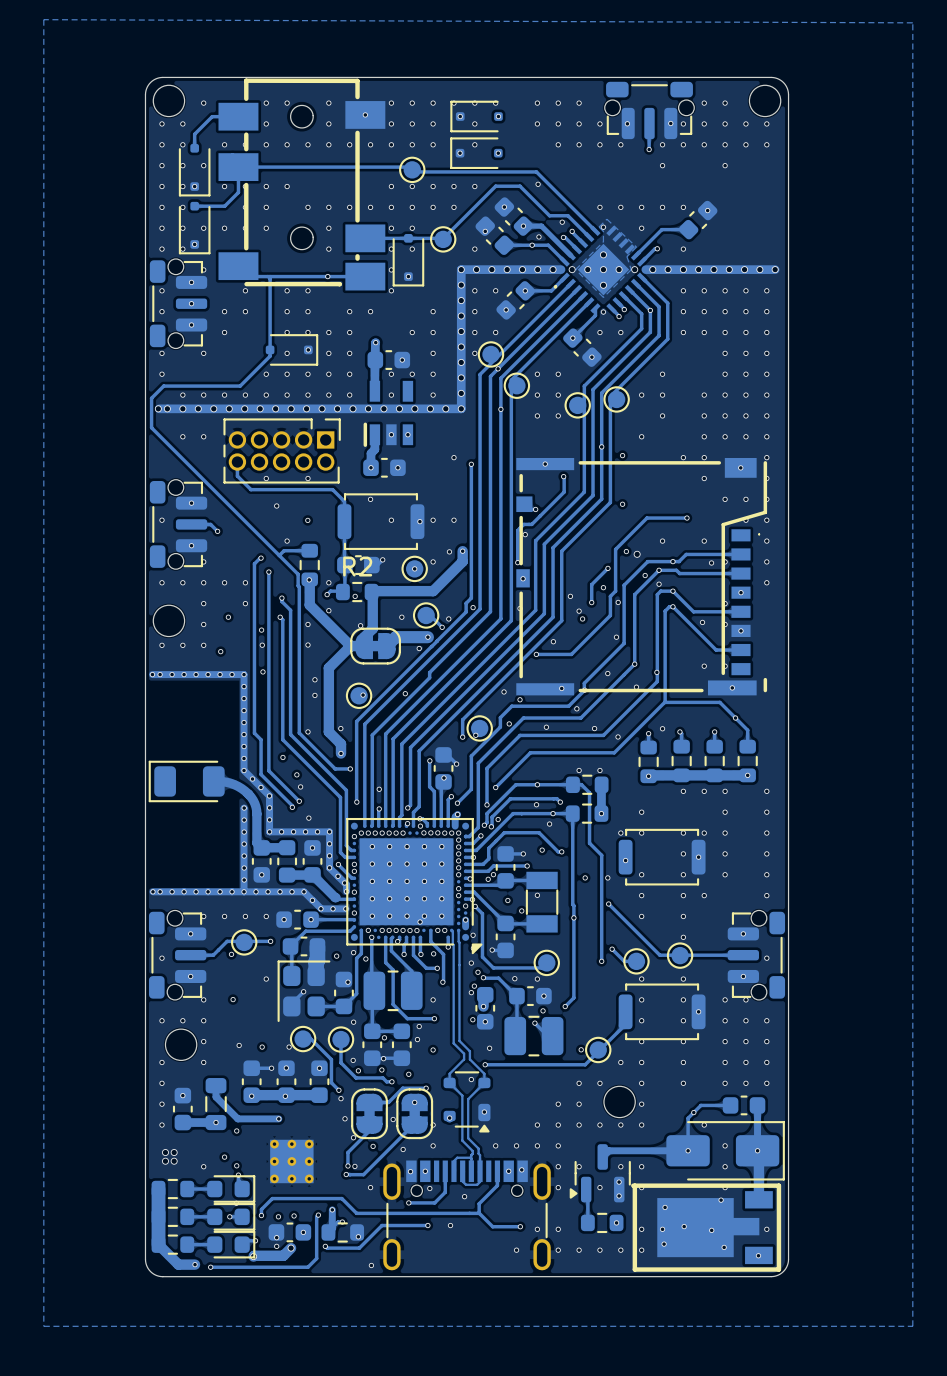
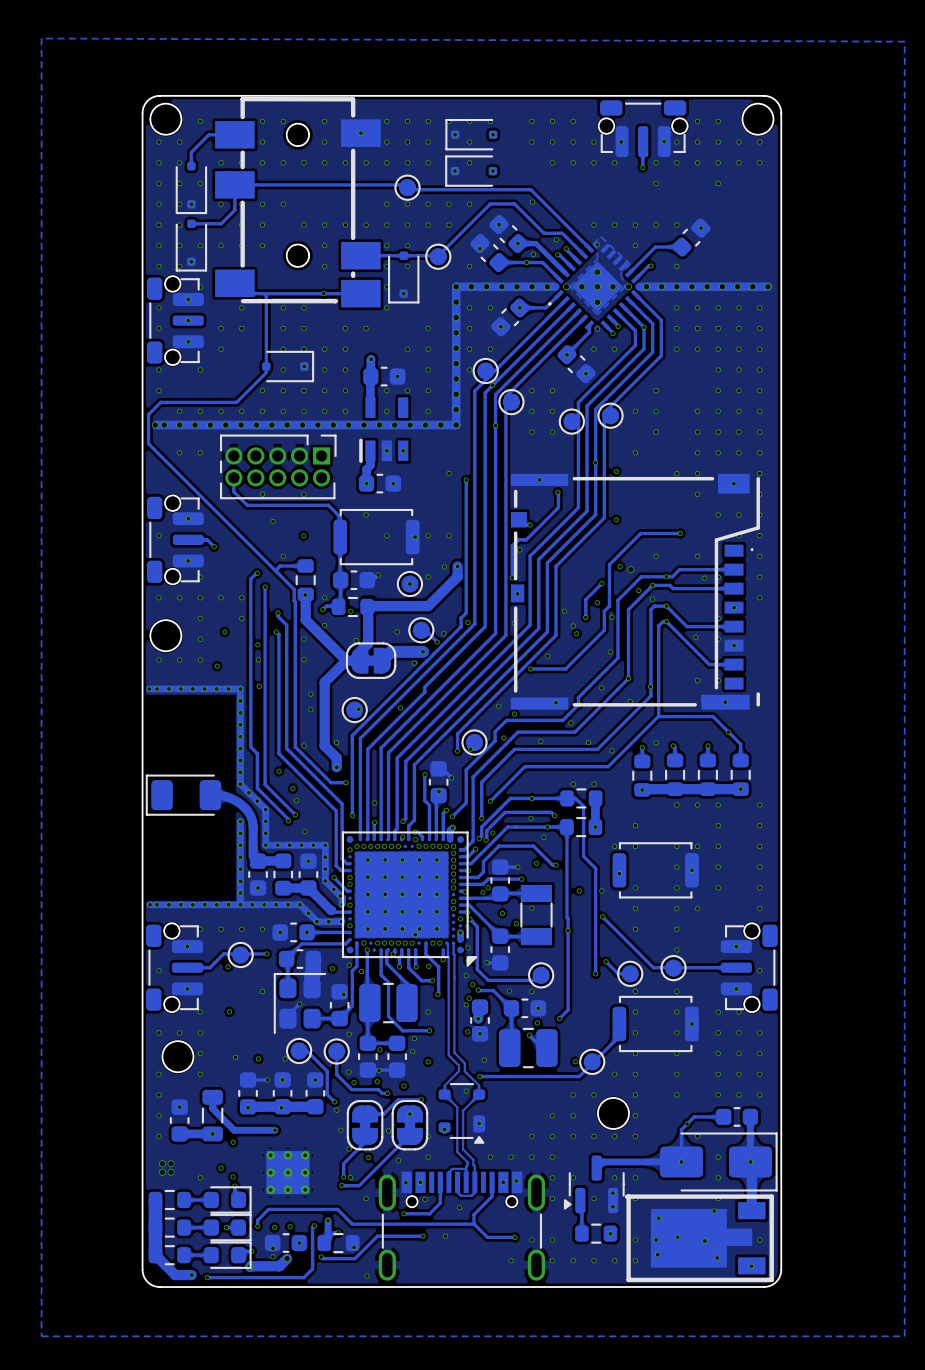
R2 name: R2 (357, 566) -> none

